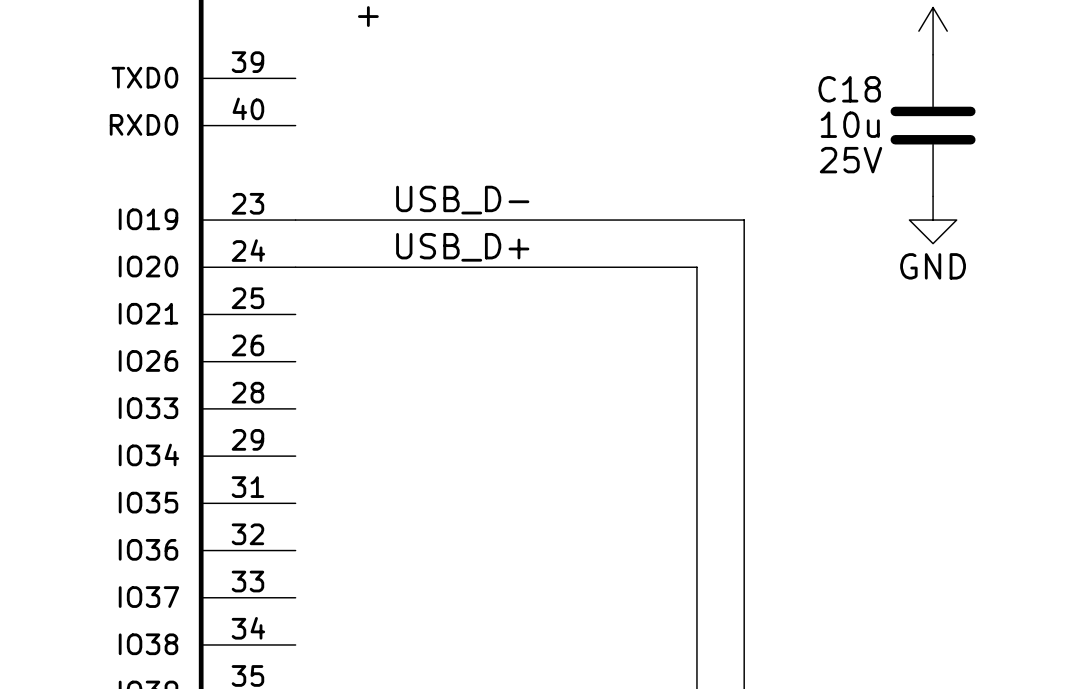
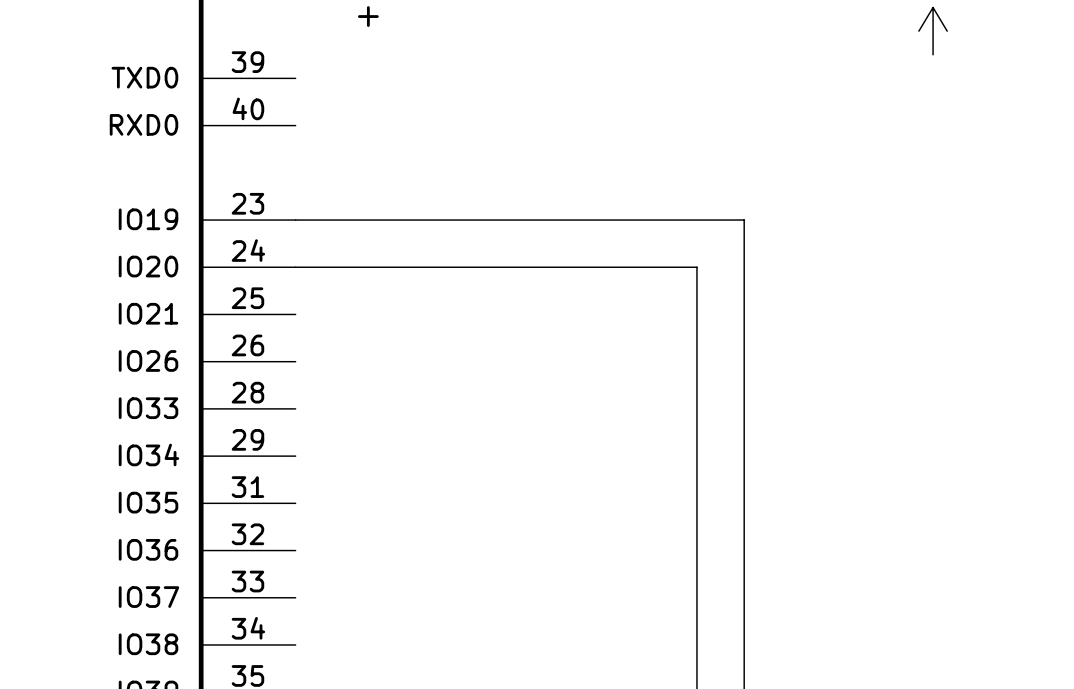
C18: 10u (933, 125) -> none
label: USB_D- (462, 200) -> none
power symbol: GND (933, 220) -> none
label: USB_D+ (462, 247) -> none

